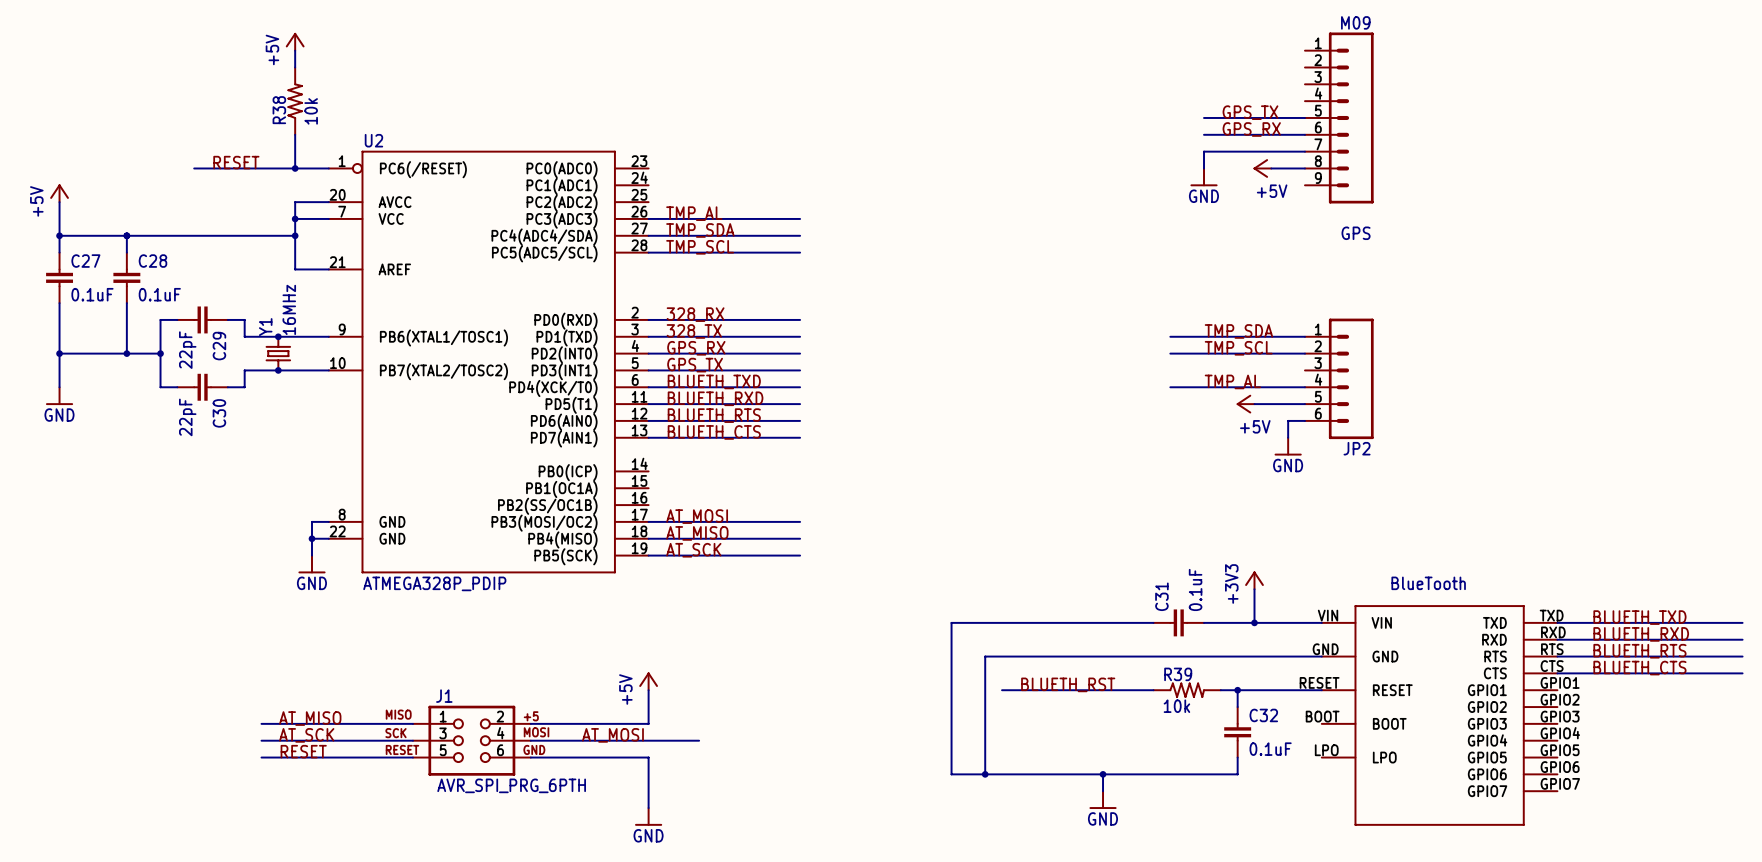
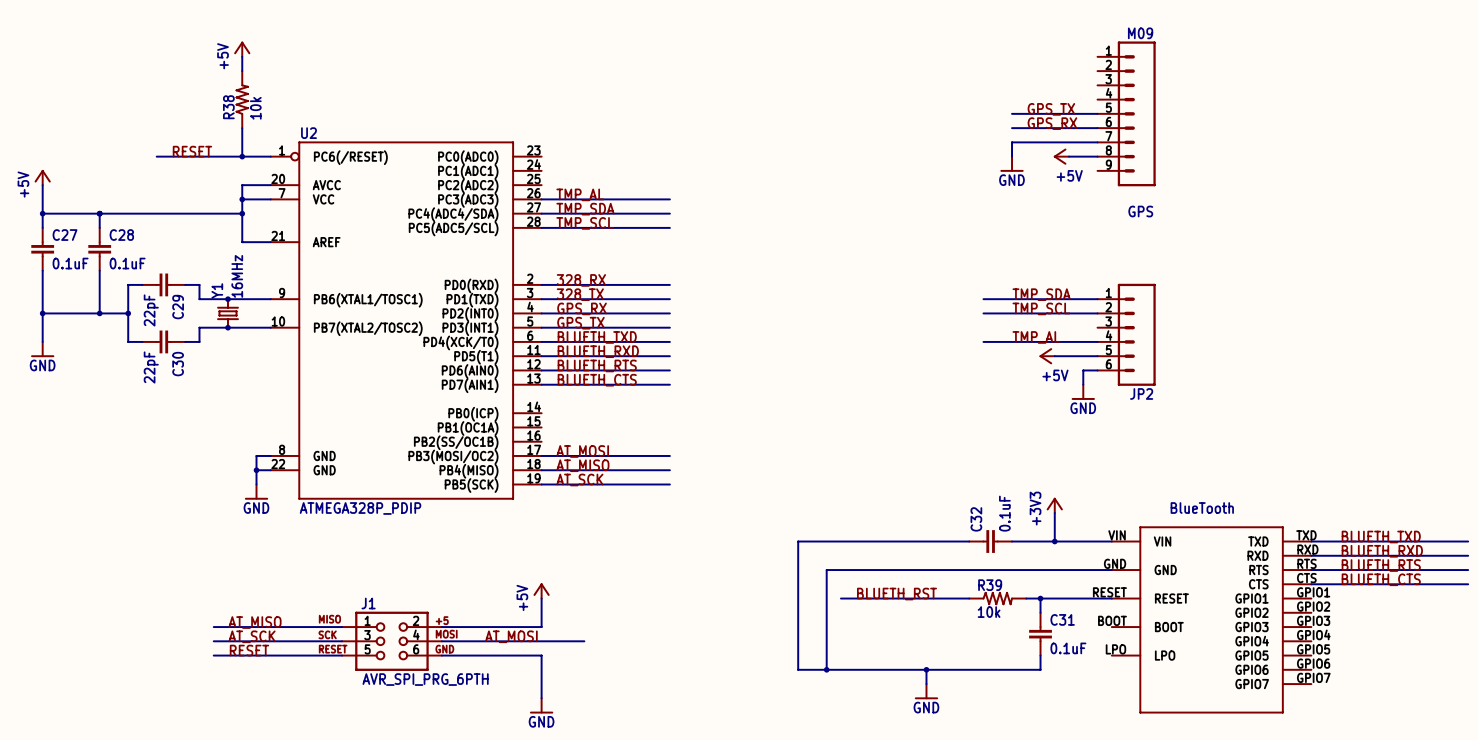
C31 name: C31 (1161, 596) -> C32 (976, 519)
C32 name: C32 (1263, 715) -> C31 (1062, 619)

